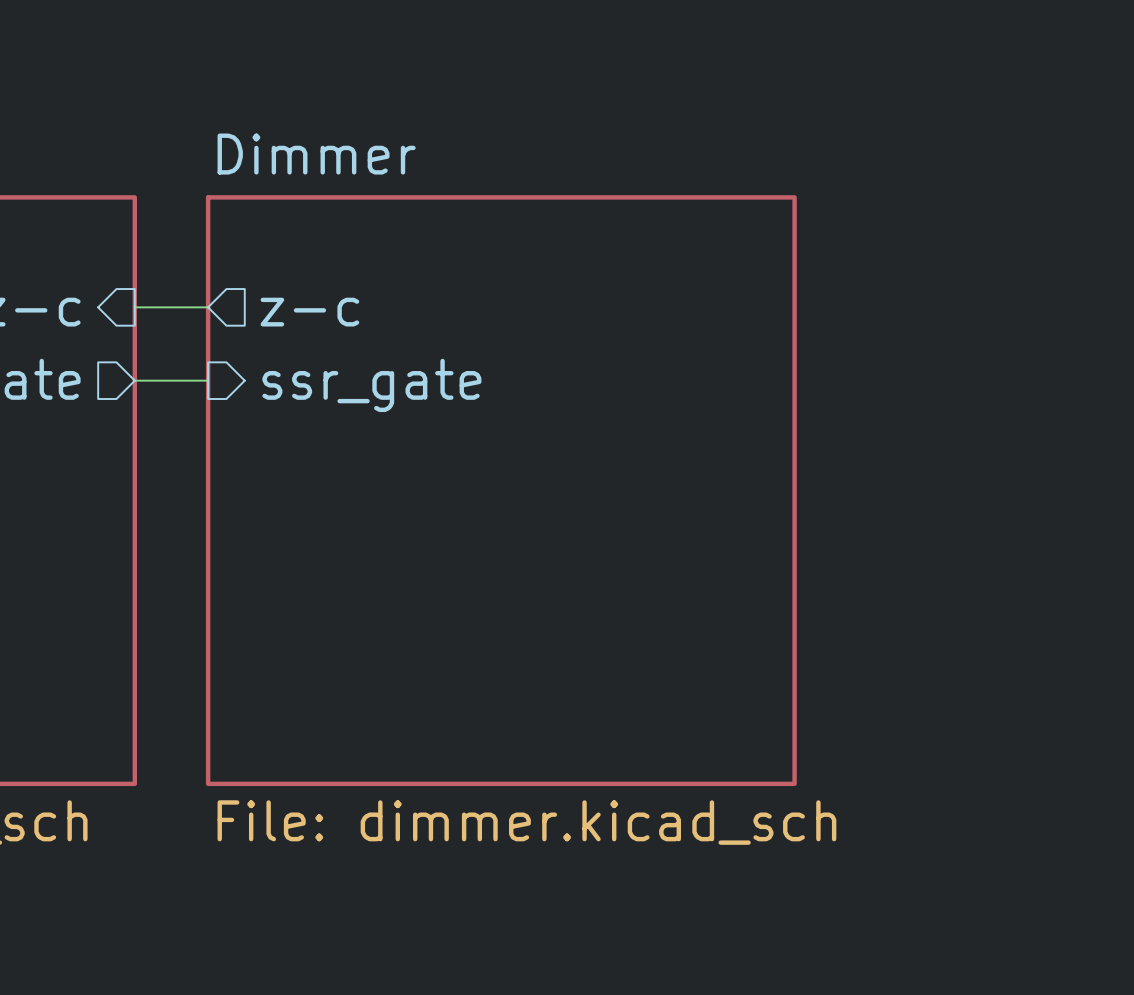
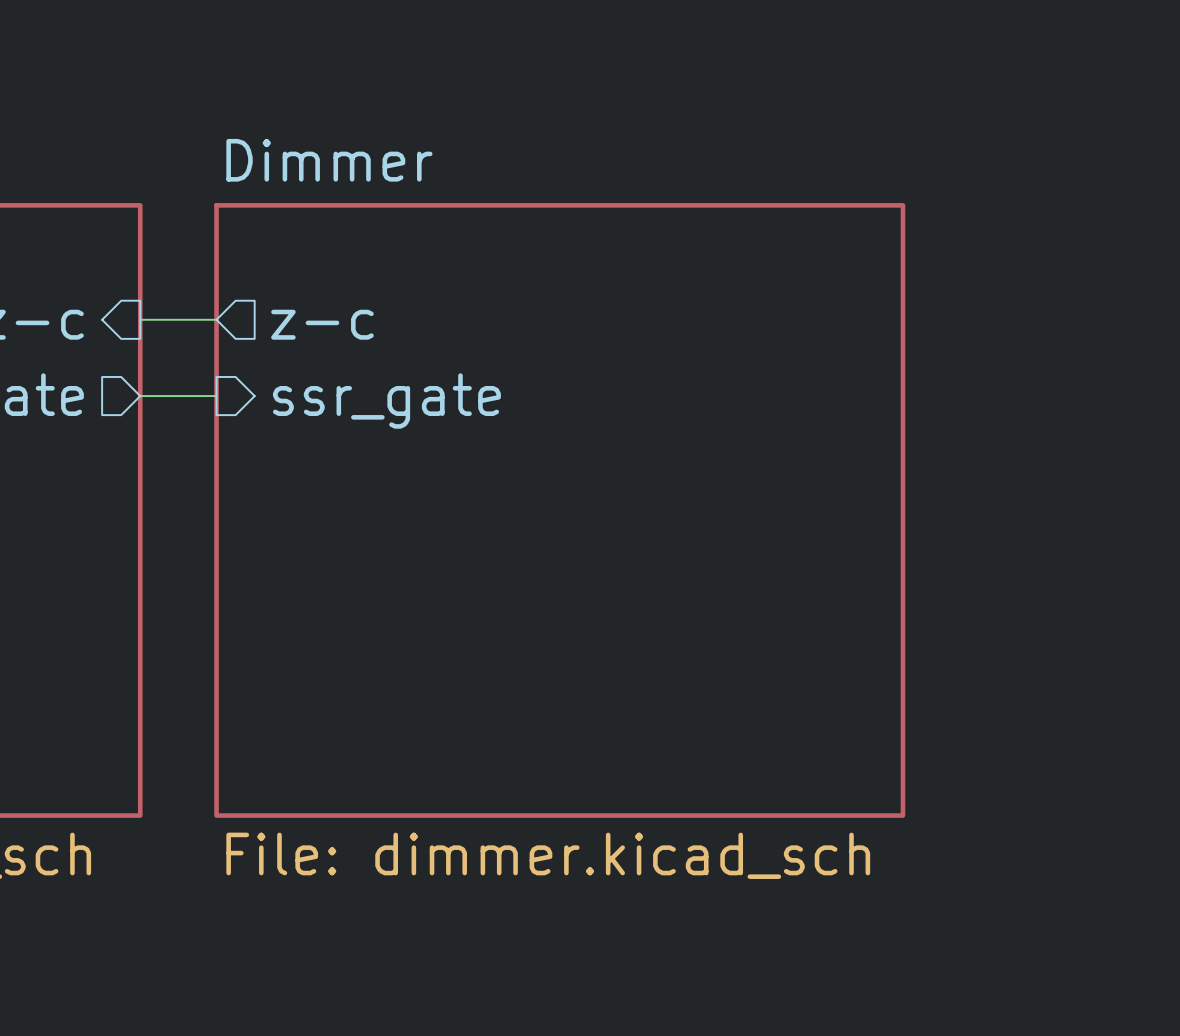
sheet Dimmer: File: dimmer.kicad_sch (501, 490) -> none
sheet Dimmer: none -> File: dimmer.kicad_sch (559, 510)

